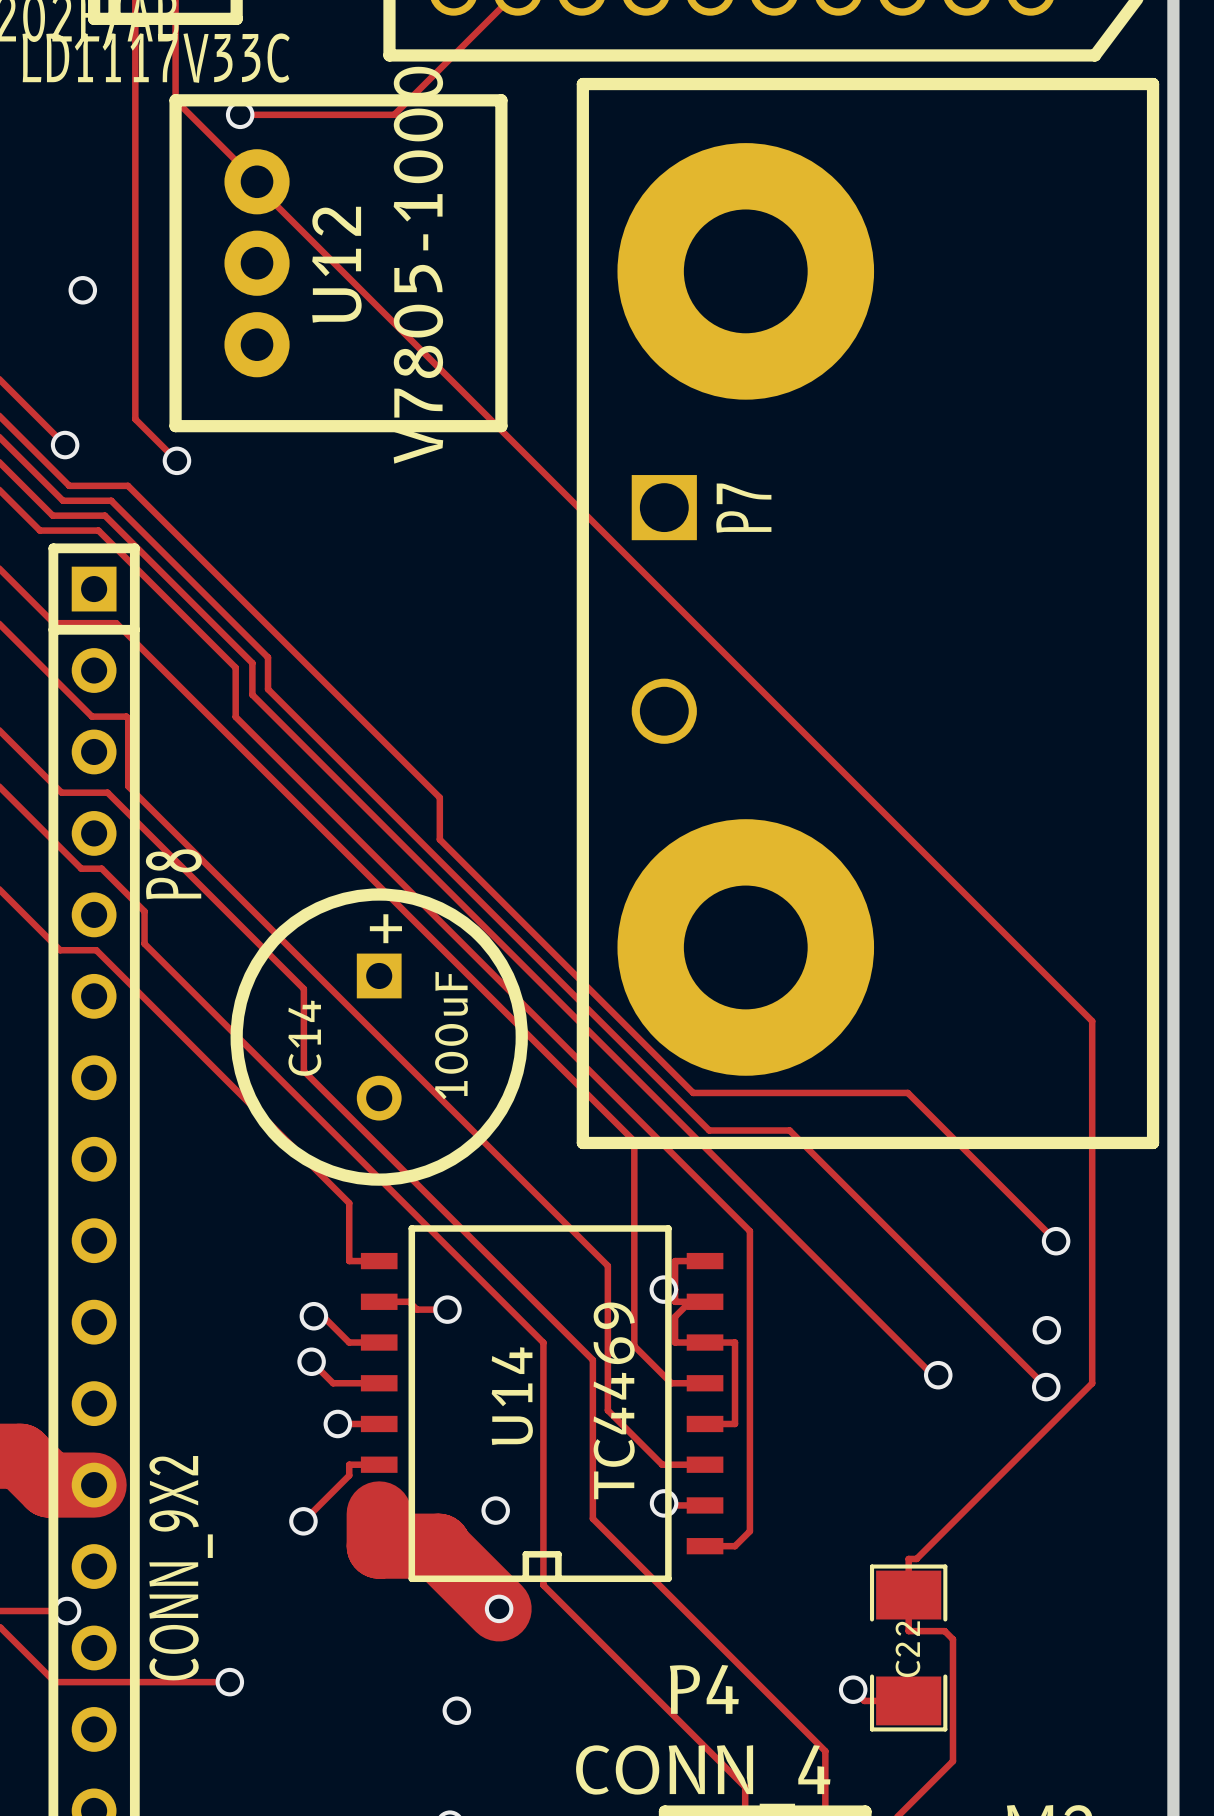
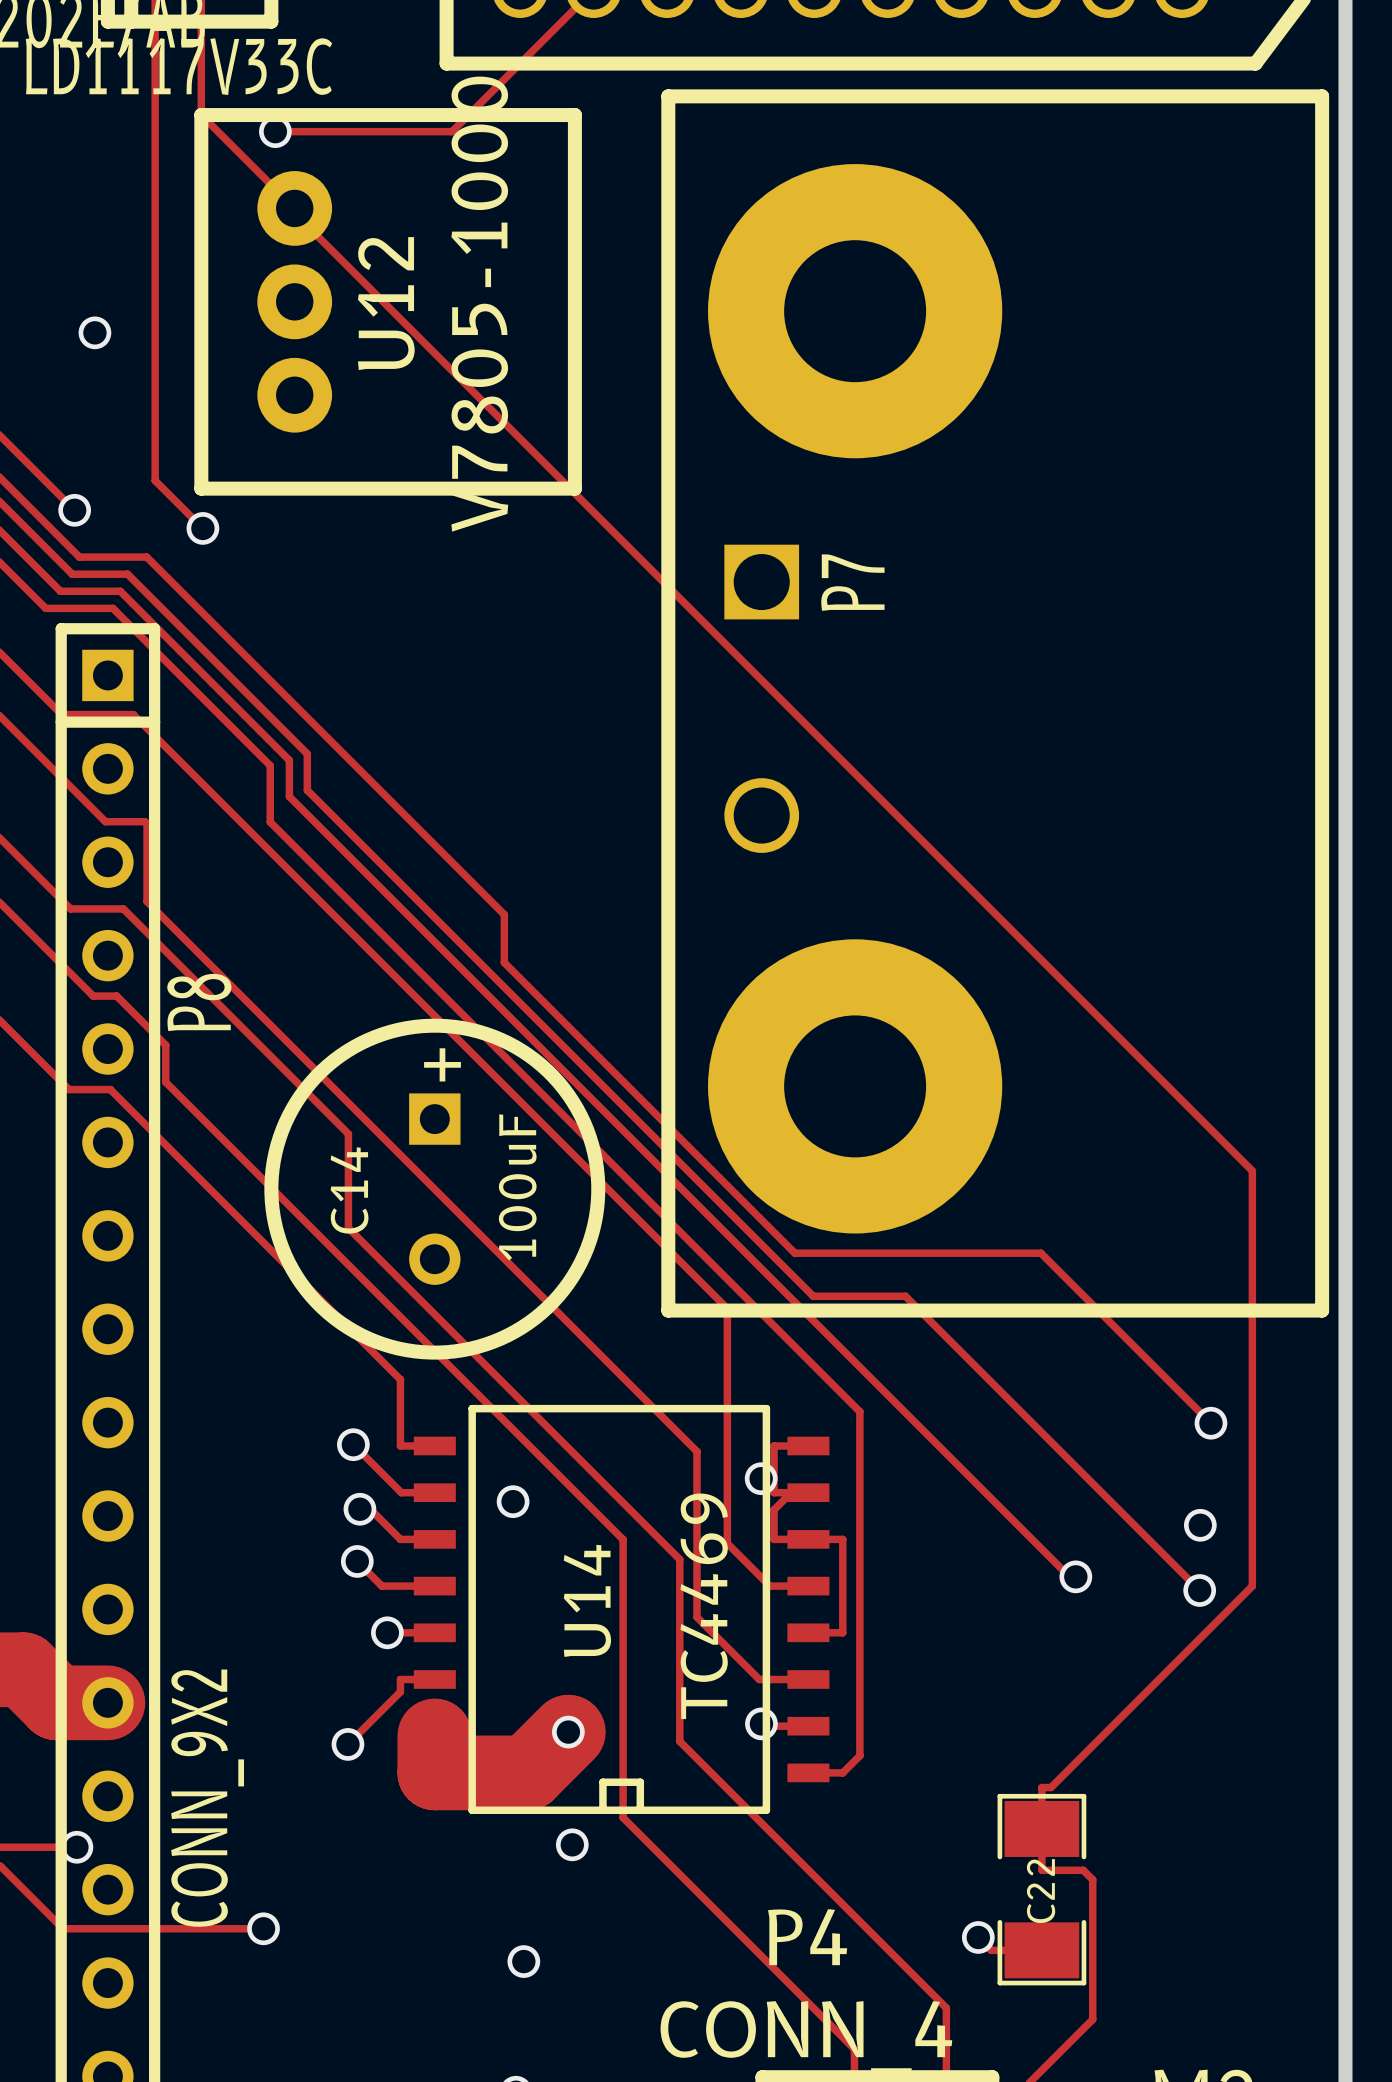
via: none -> (353, 1444)
track: (379, 1301) (409, 1301) (417, 1309) (447, 1309) -> (434, 1492) (401, 1492) (353, 1444)
track: (438, 1546) (499, 1608) -> (502, 1772) (527, 1772) (568, 1732)

